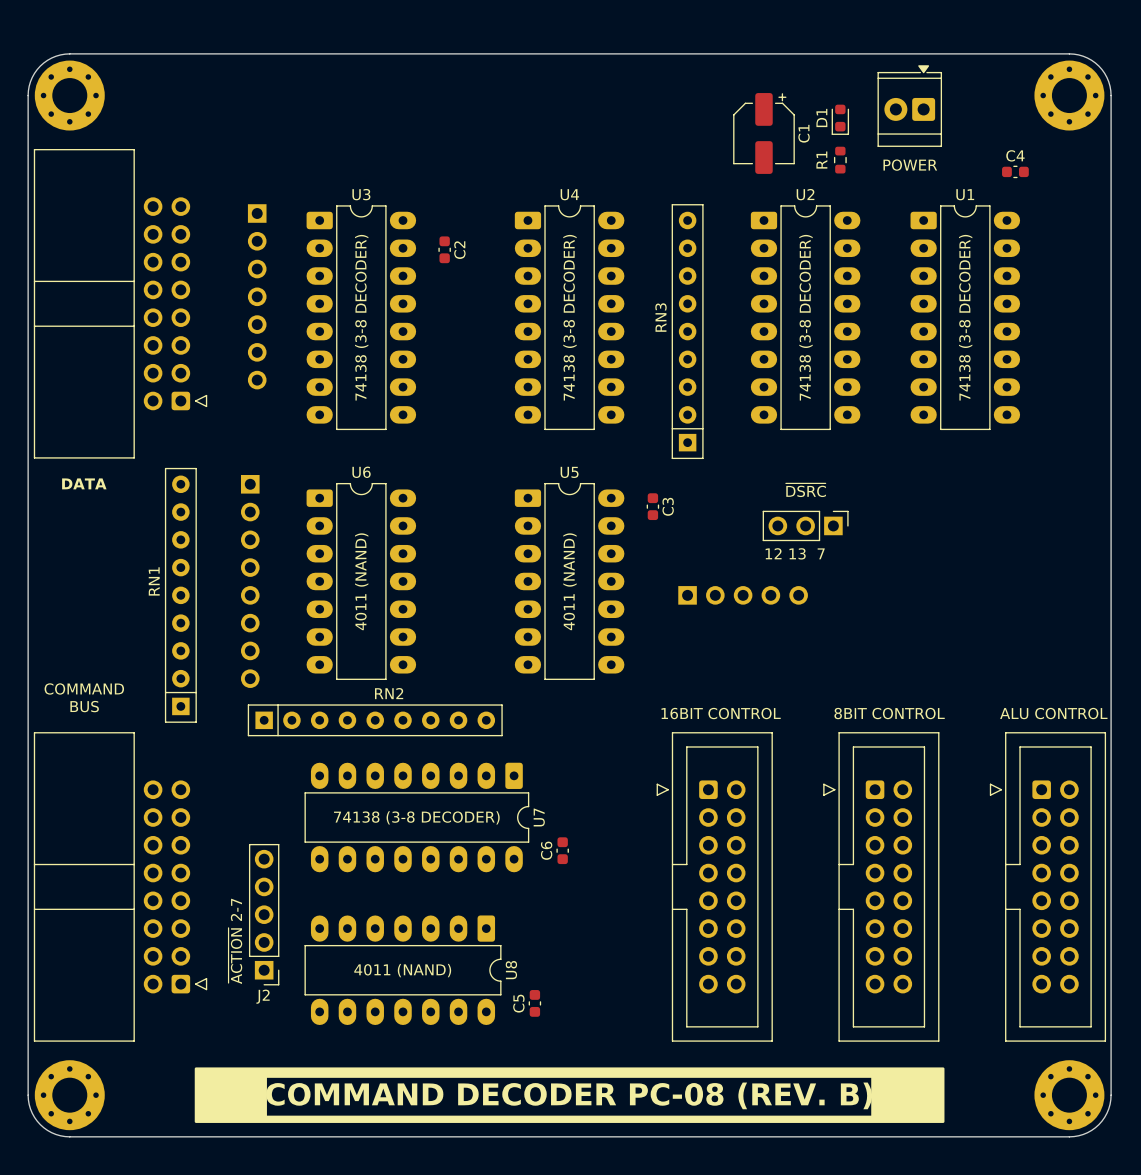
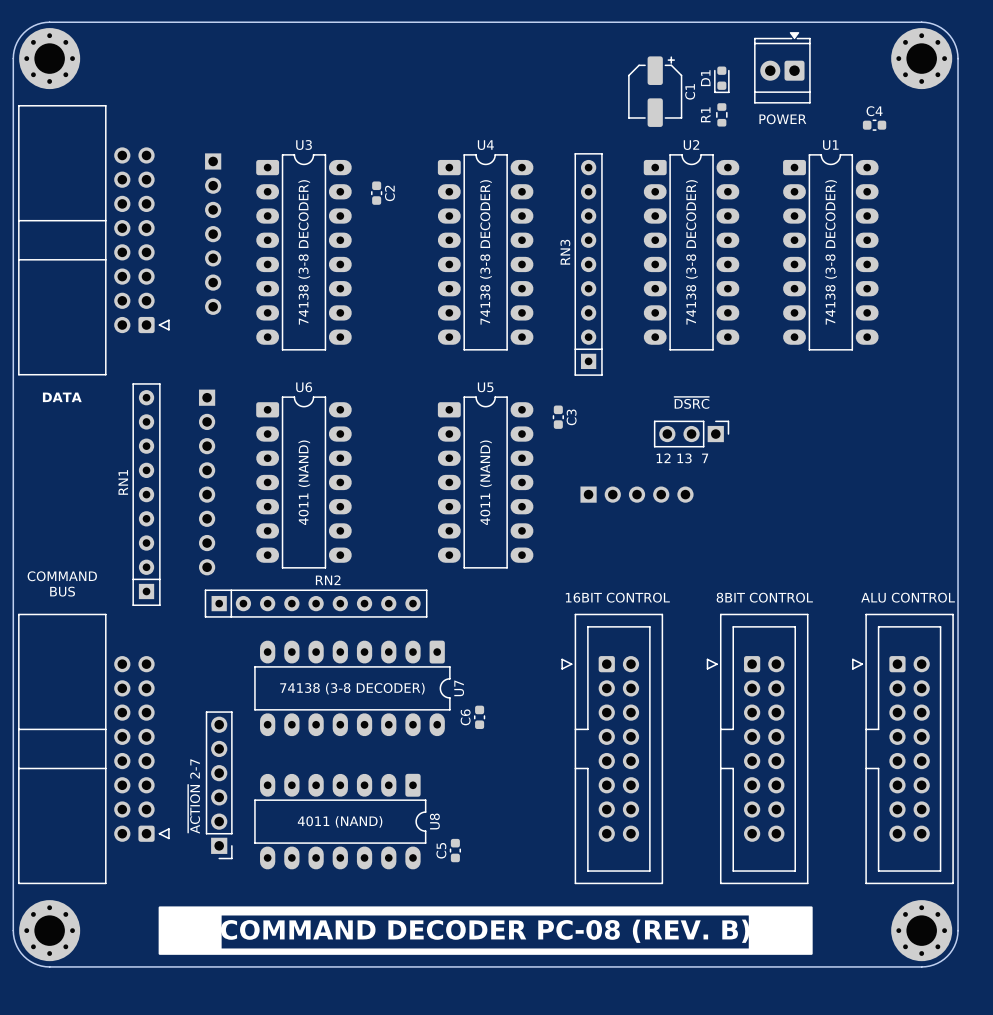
J2: (264, 914) -> none
part: none -> (219, 785)

